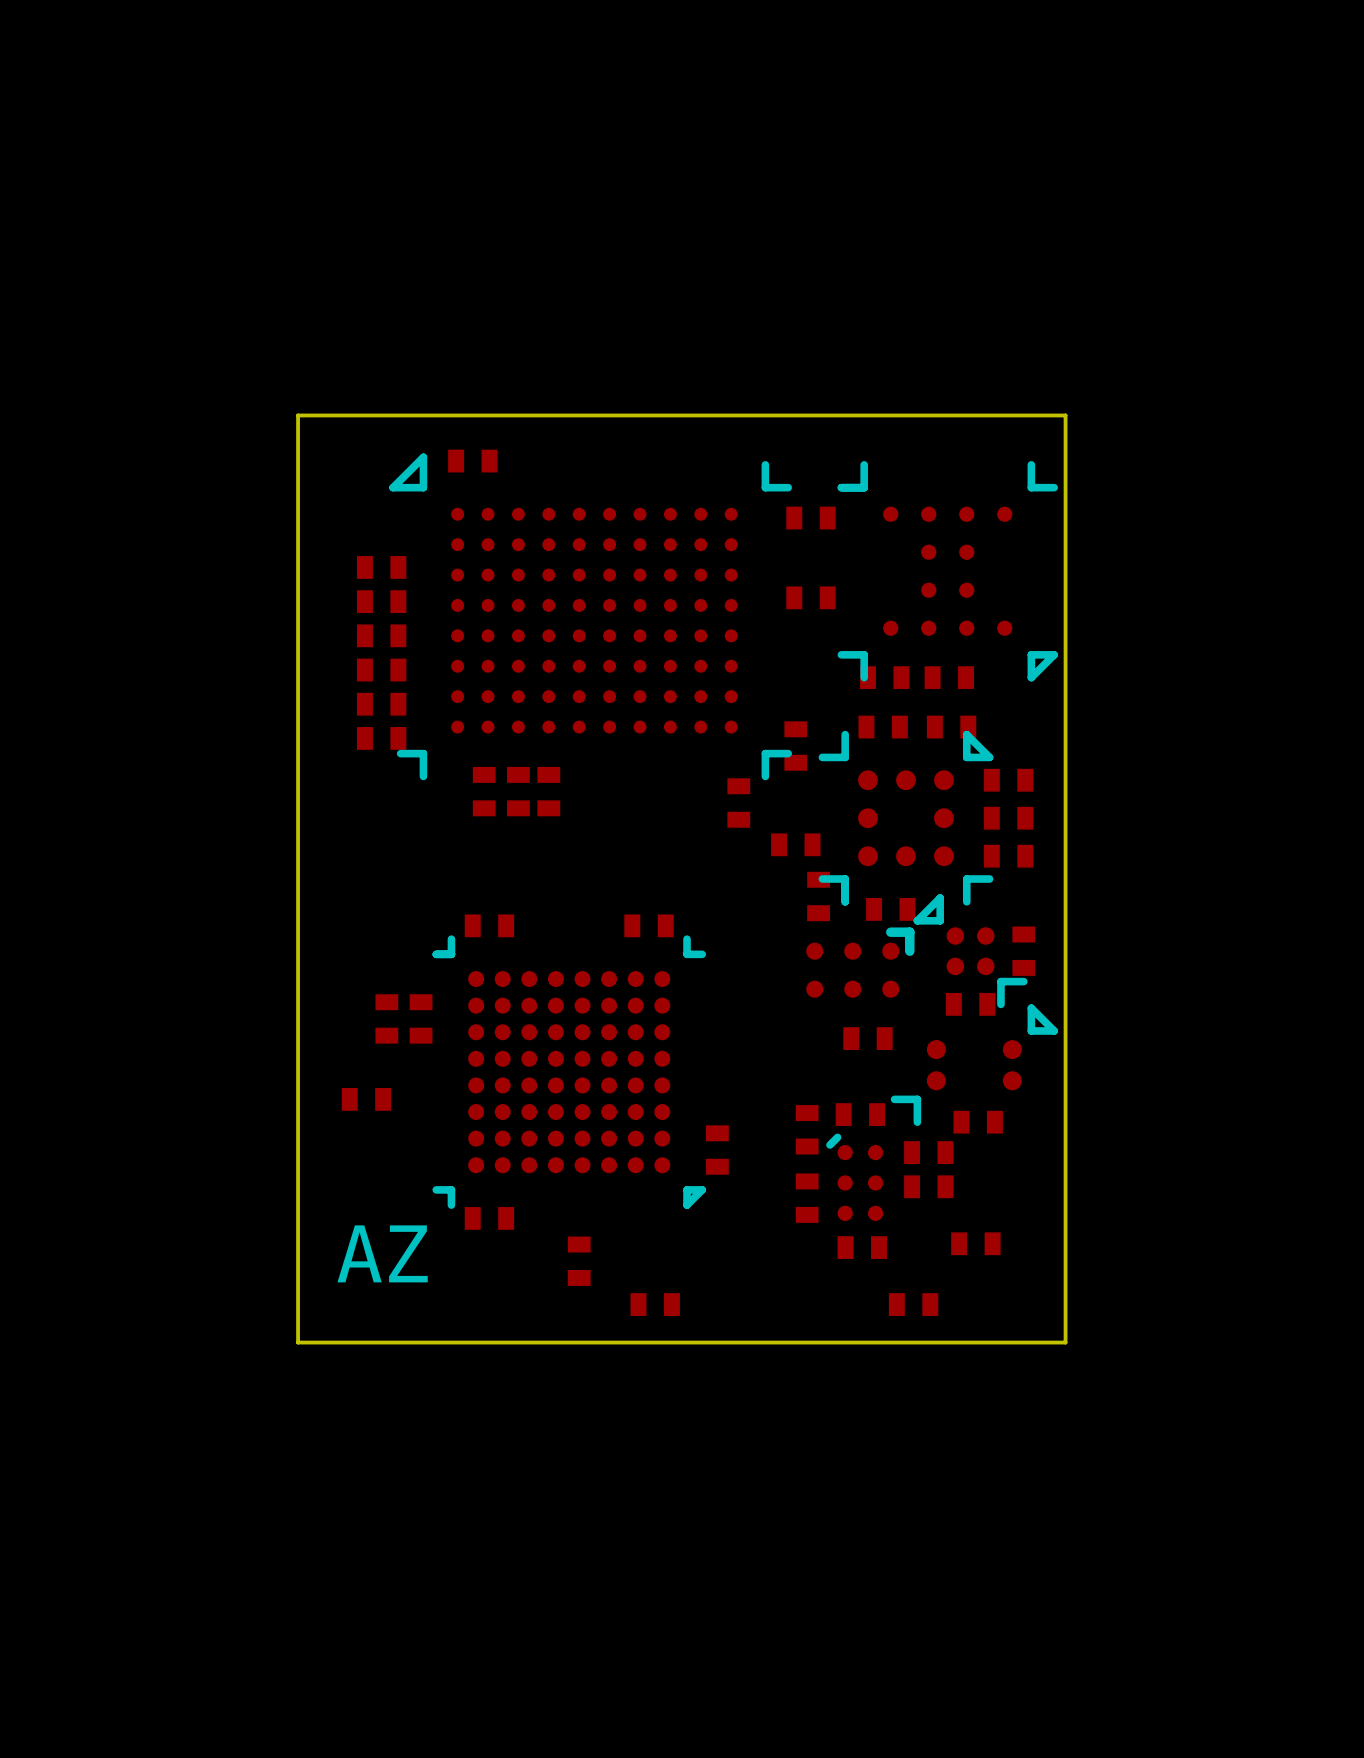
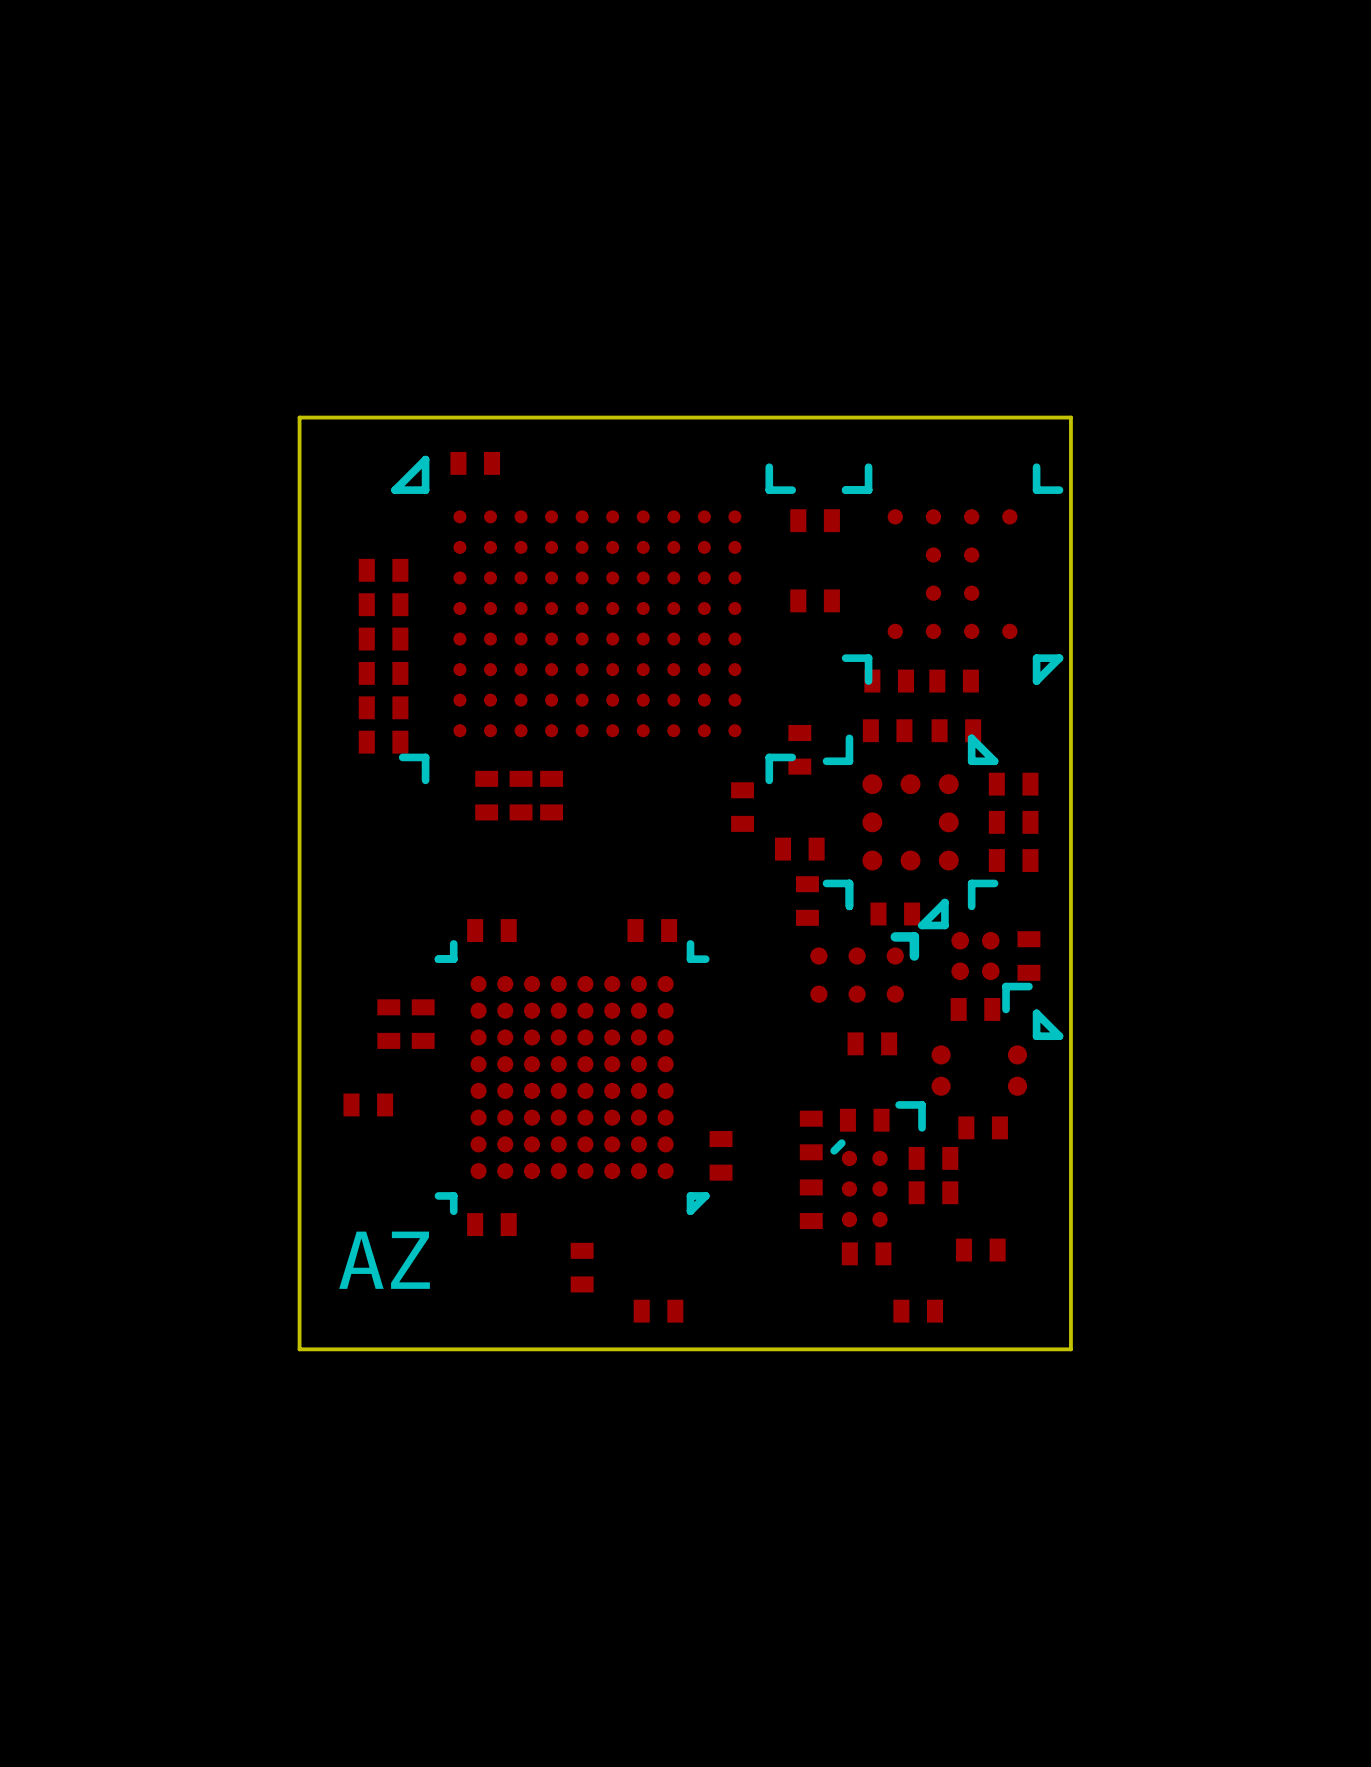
part position: (818, 896) -> (807, 901)

